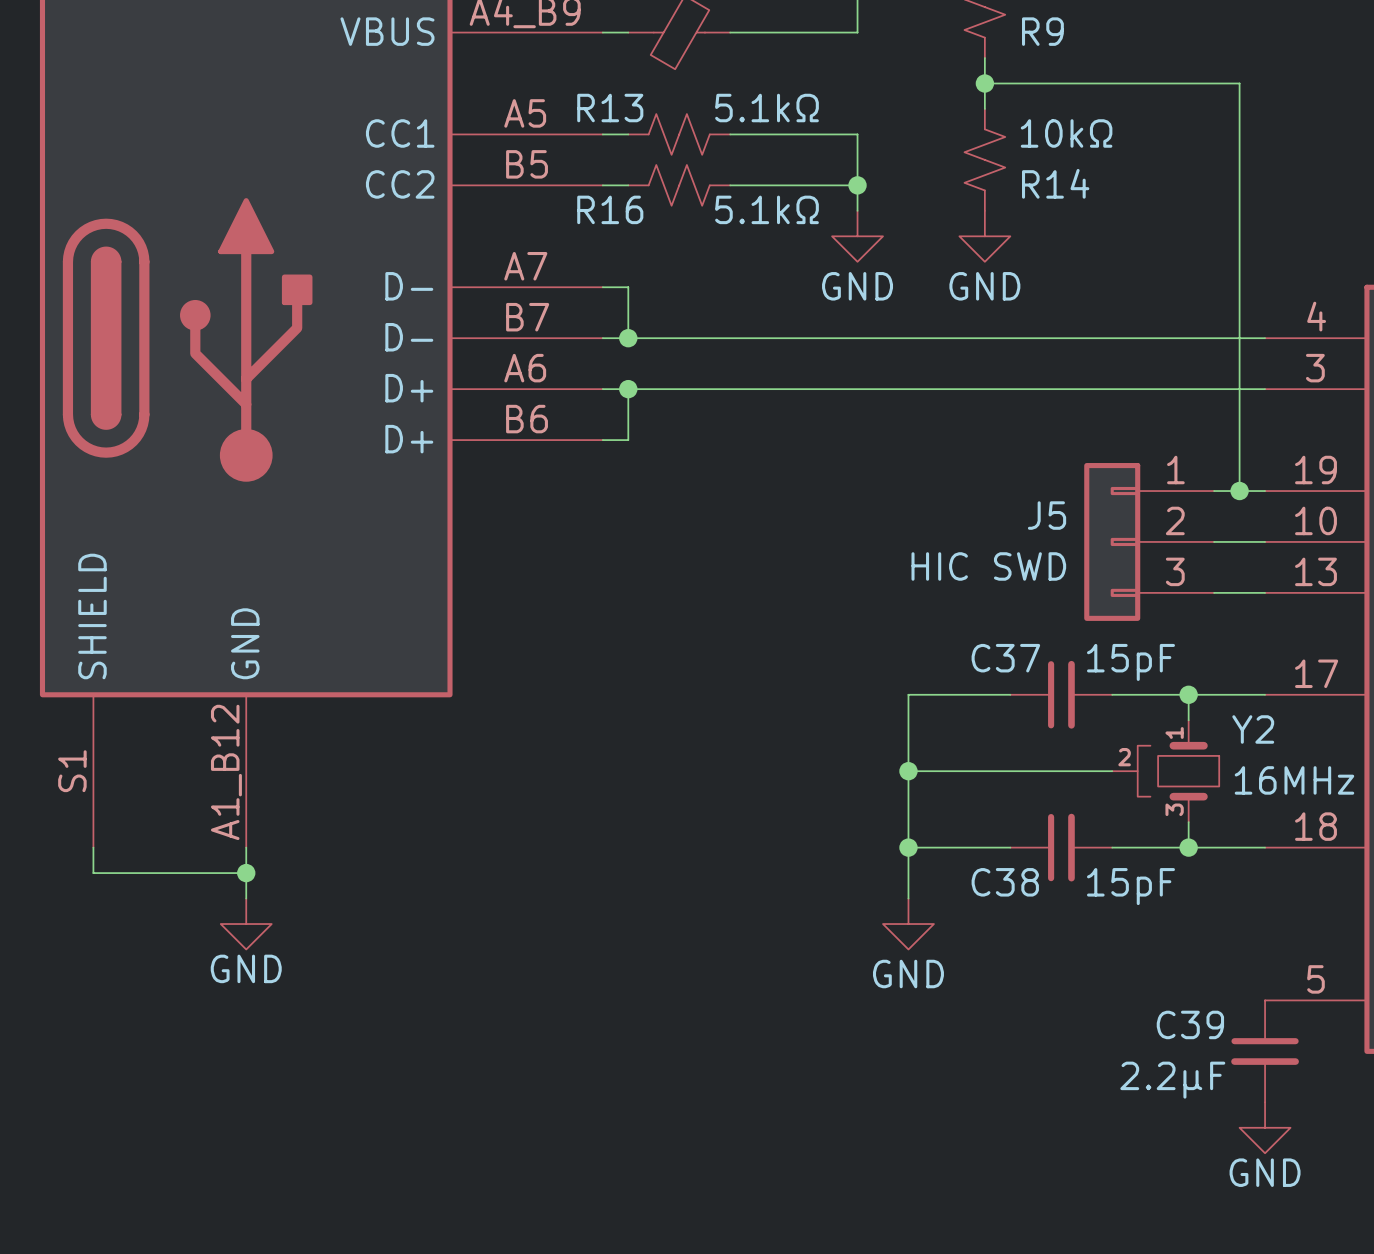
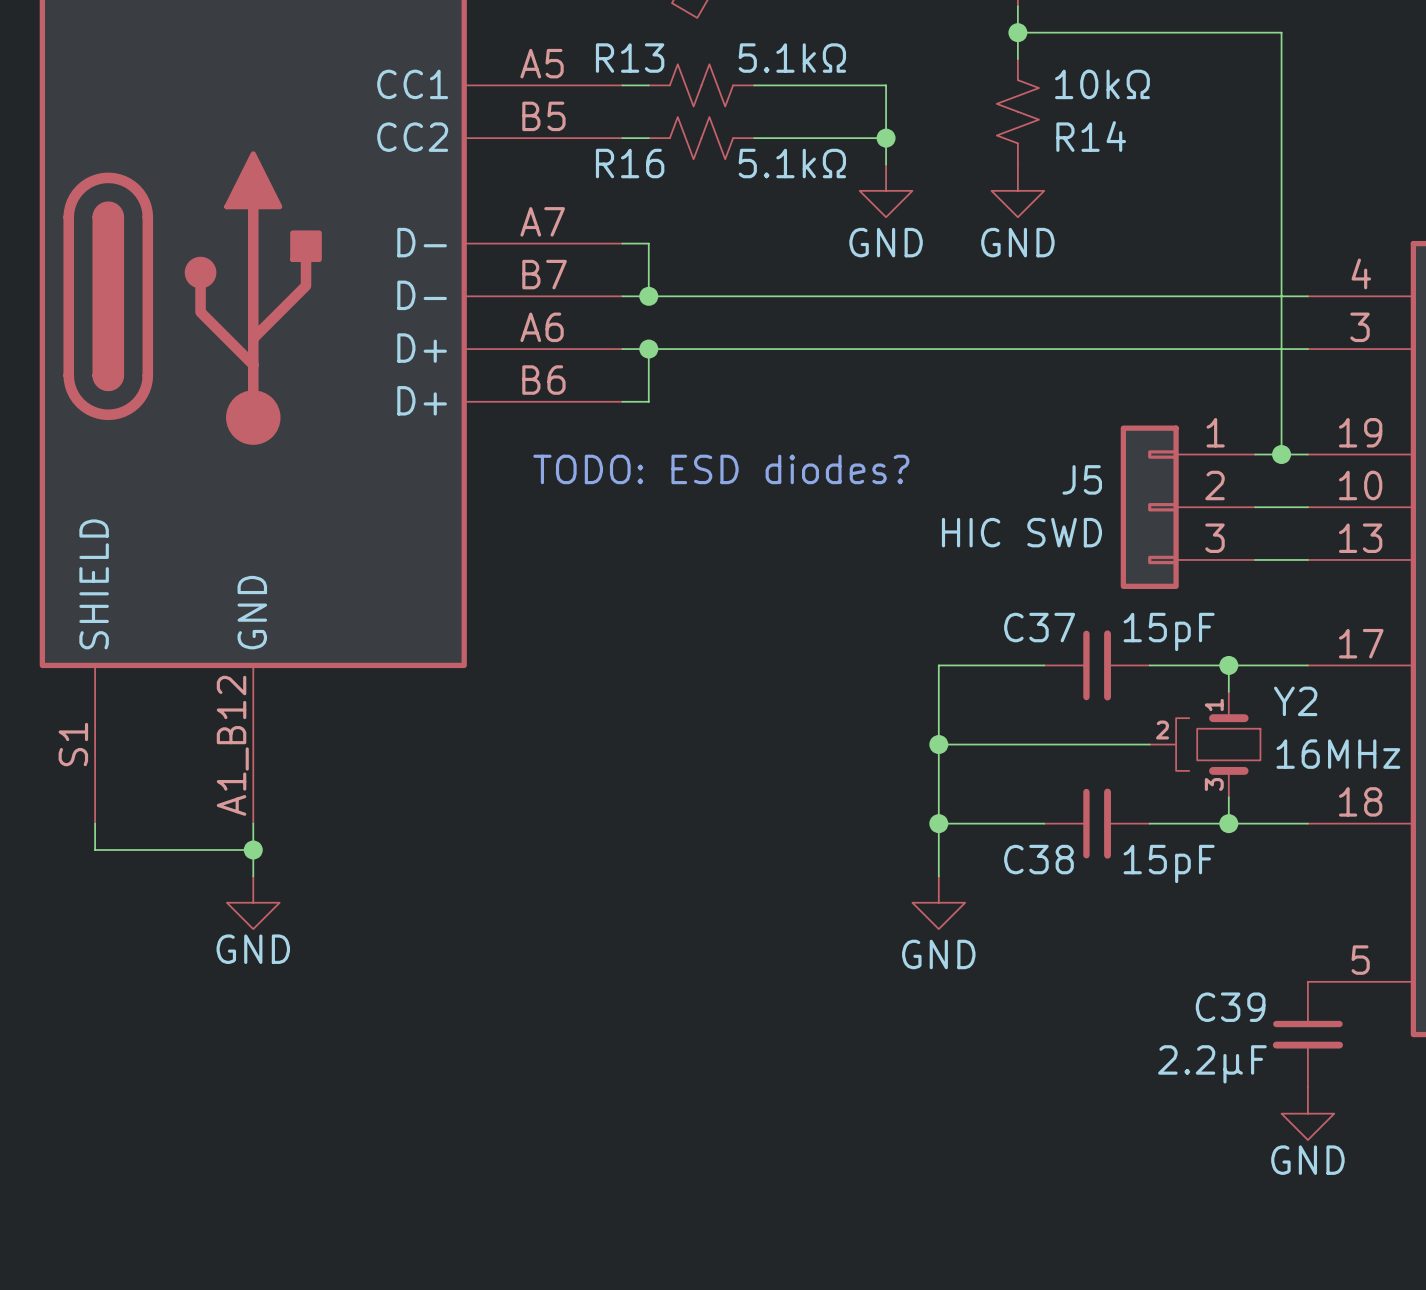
text: none -> TODO: ESD diodes? (721, 469)

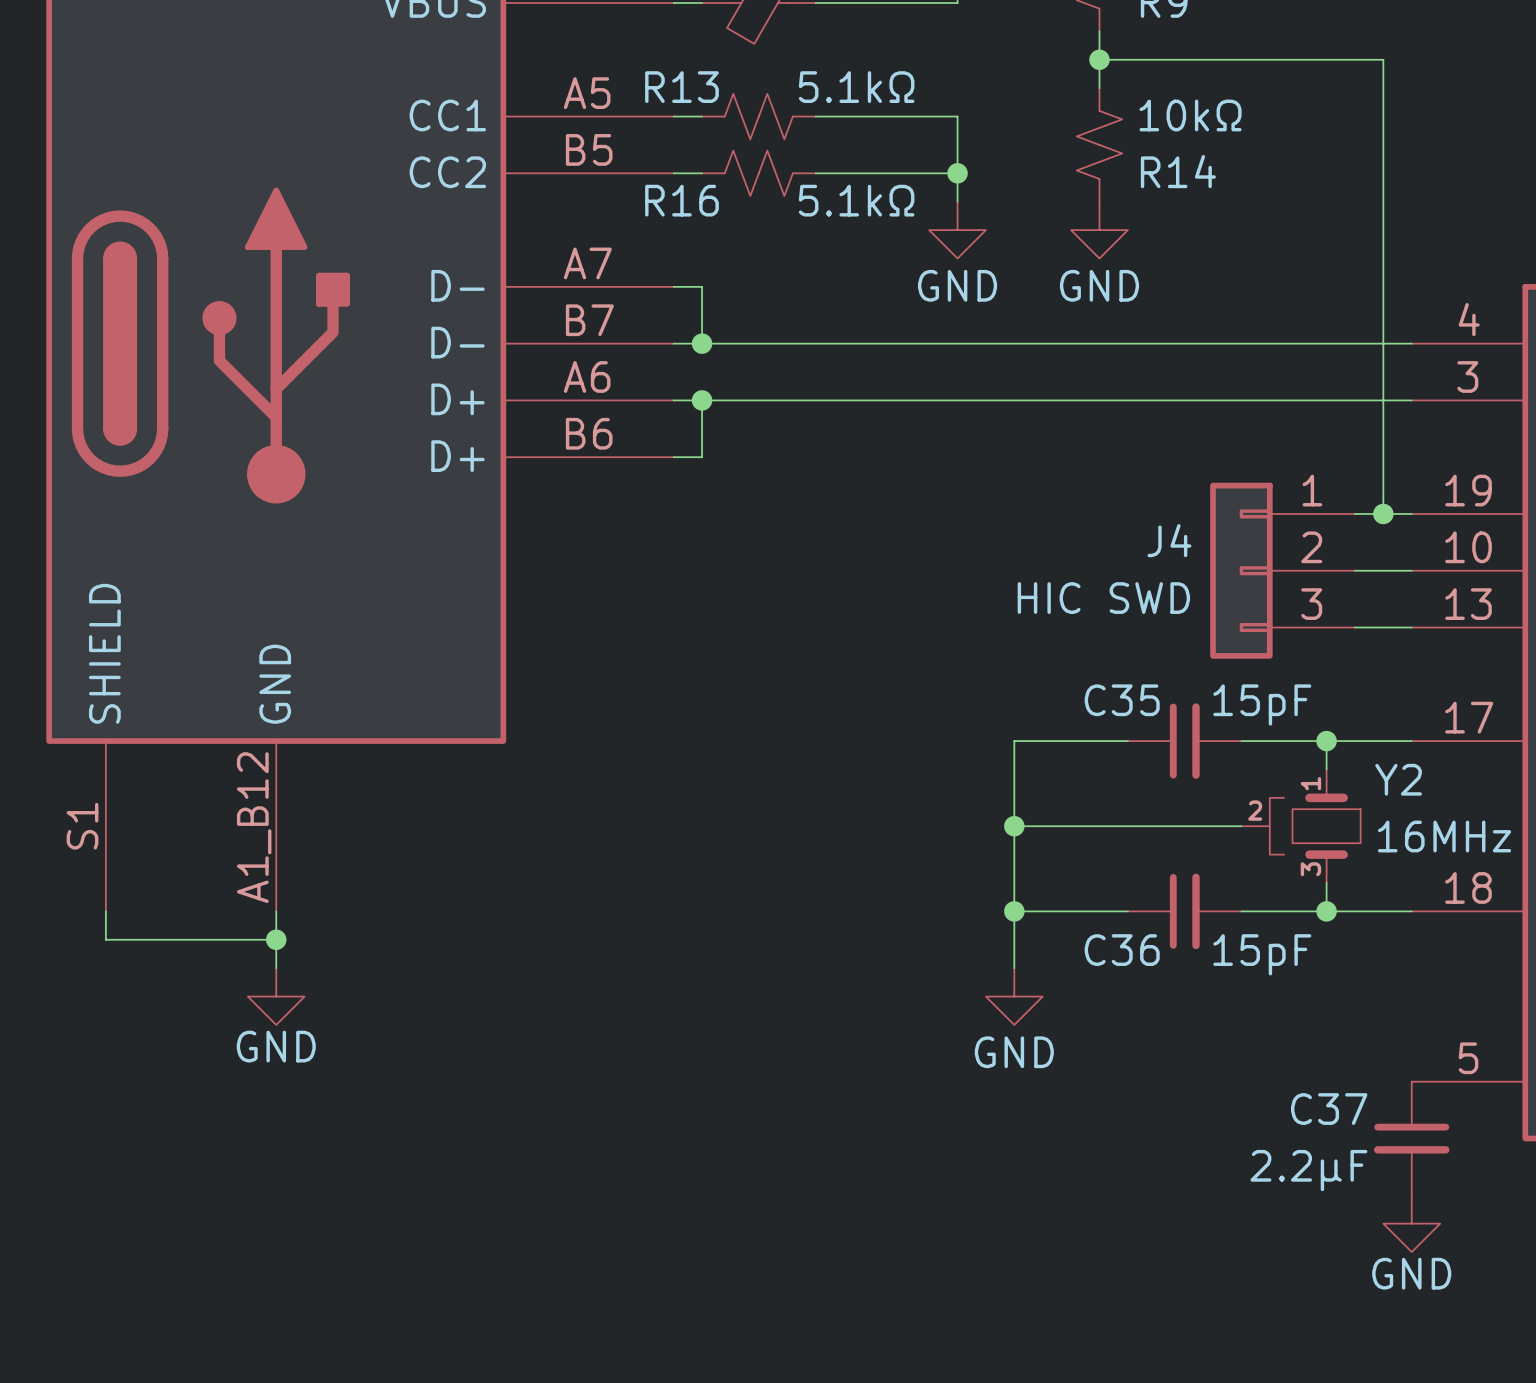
text: TODO: ESD diodes? (721, 469) -> none
J5 name: J5 (1082, 479) -> J4 (1169, 540)
C37 name: C37 (1039, 627) -> C35 (1122, 700)
C38 name: C38 (1038, 859) -> C36 (1122, 950)
C39 name: C39 (1230, 1007) -> C37 (1329, 1109)

